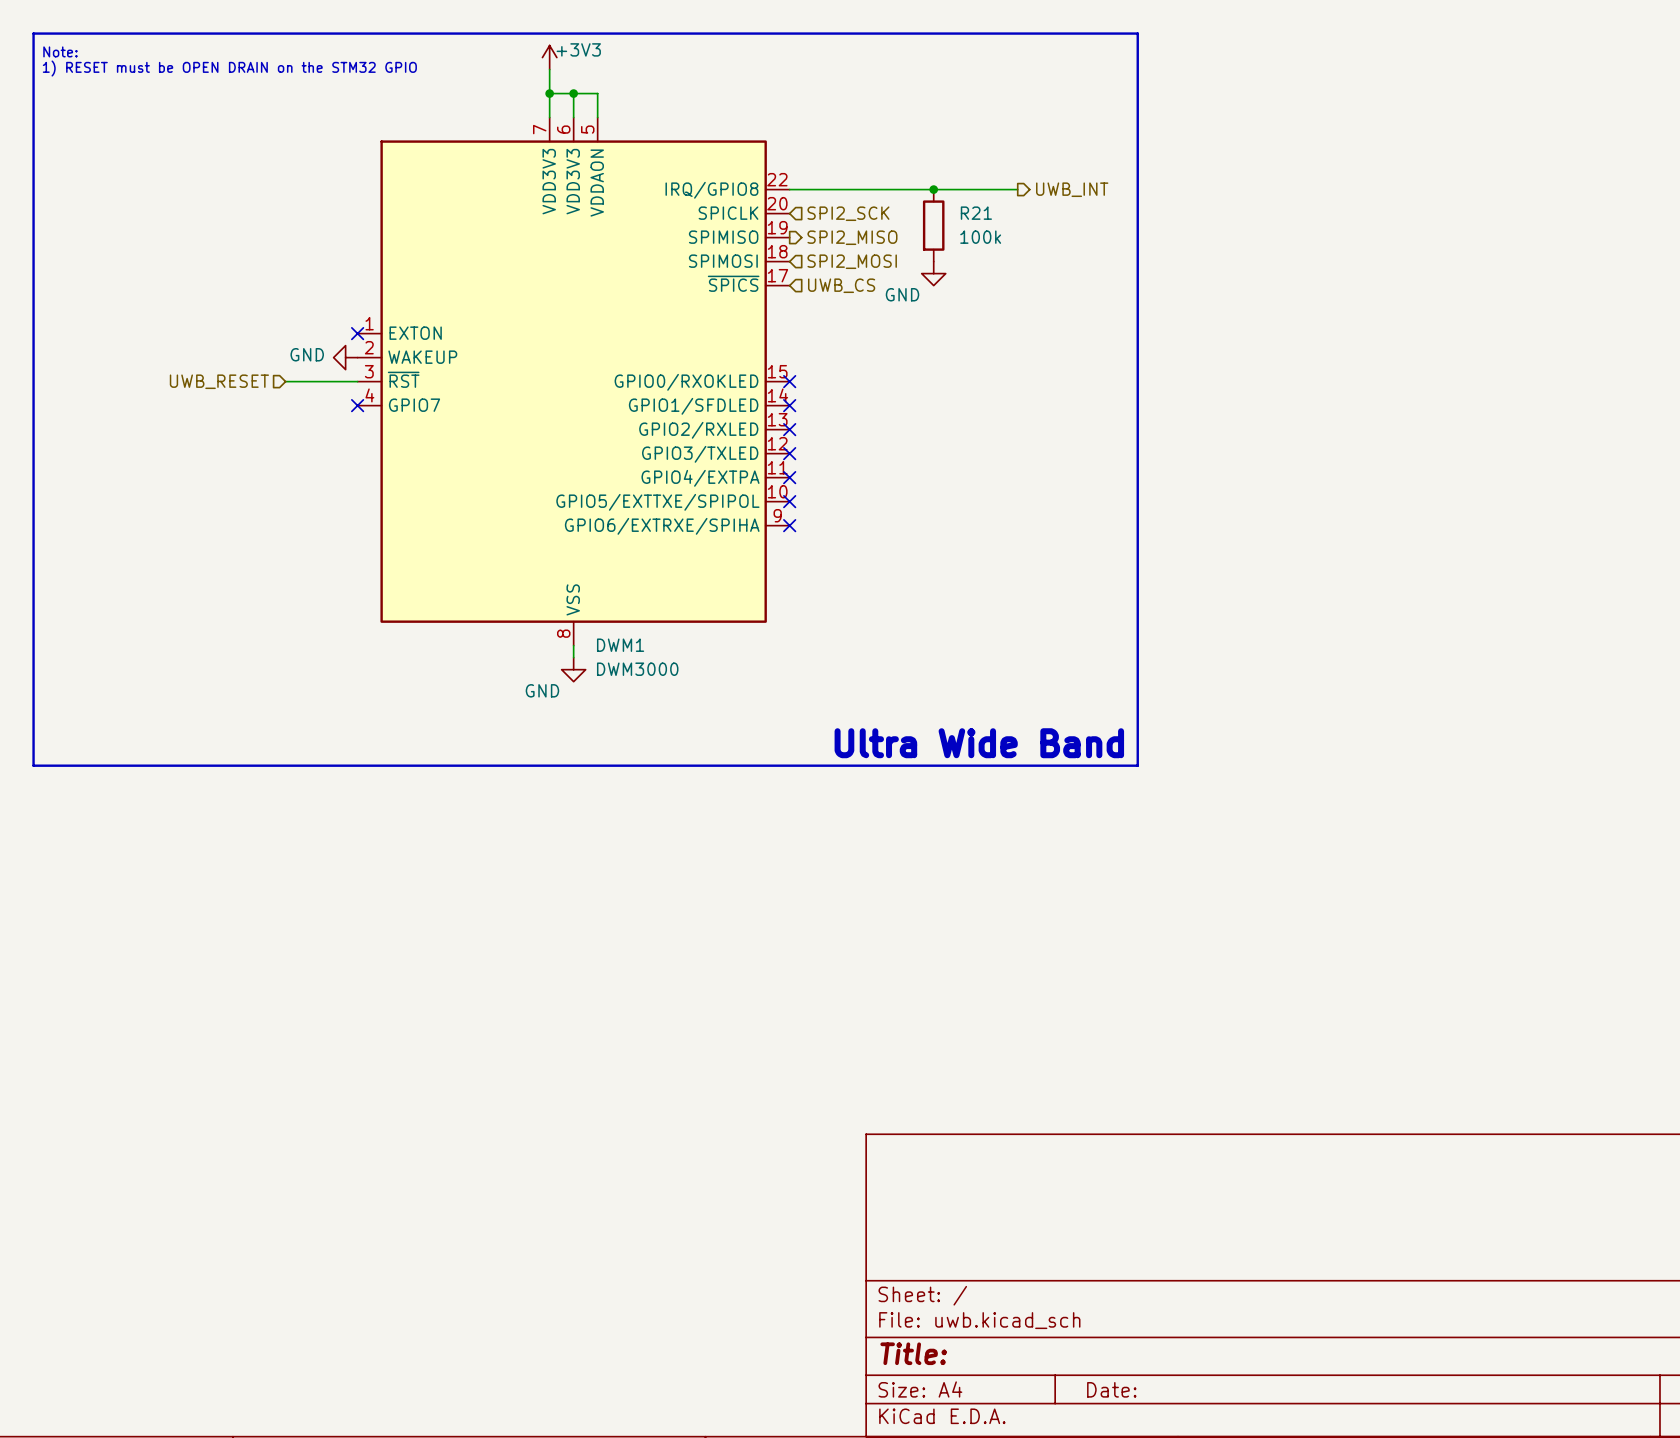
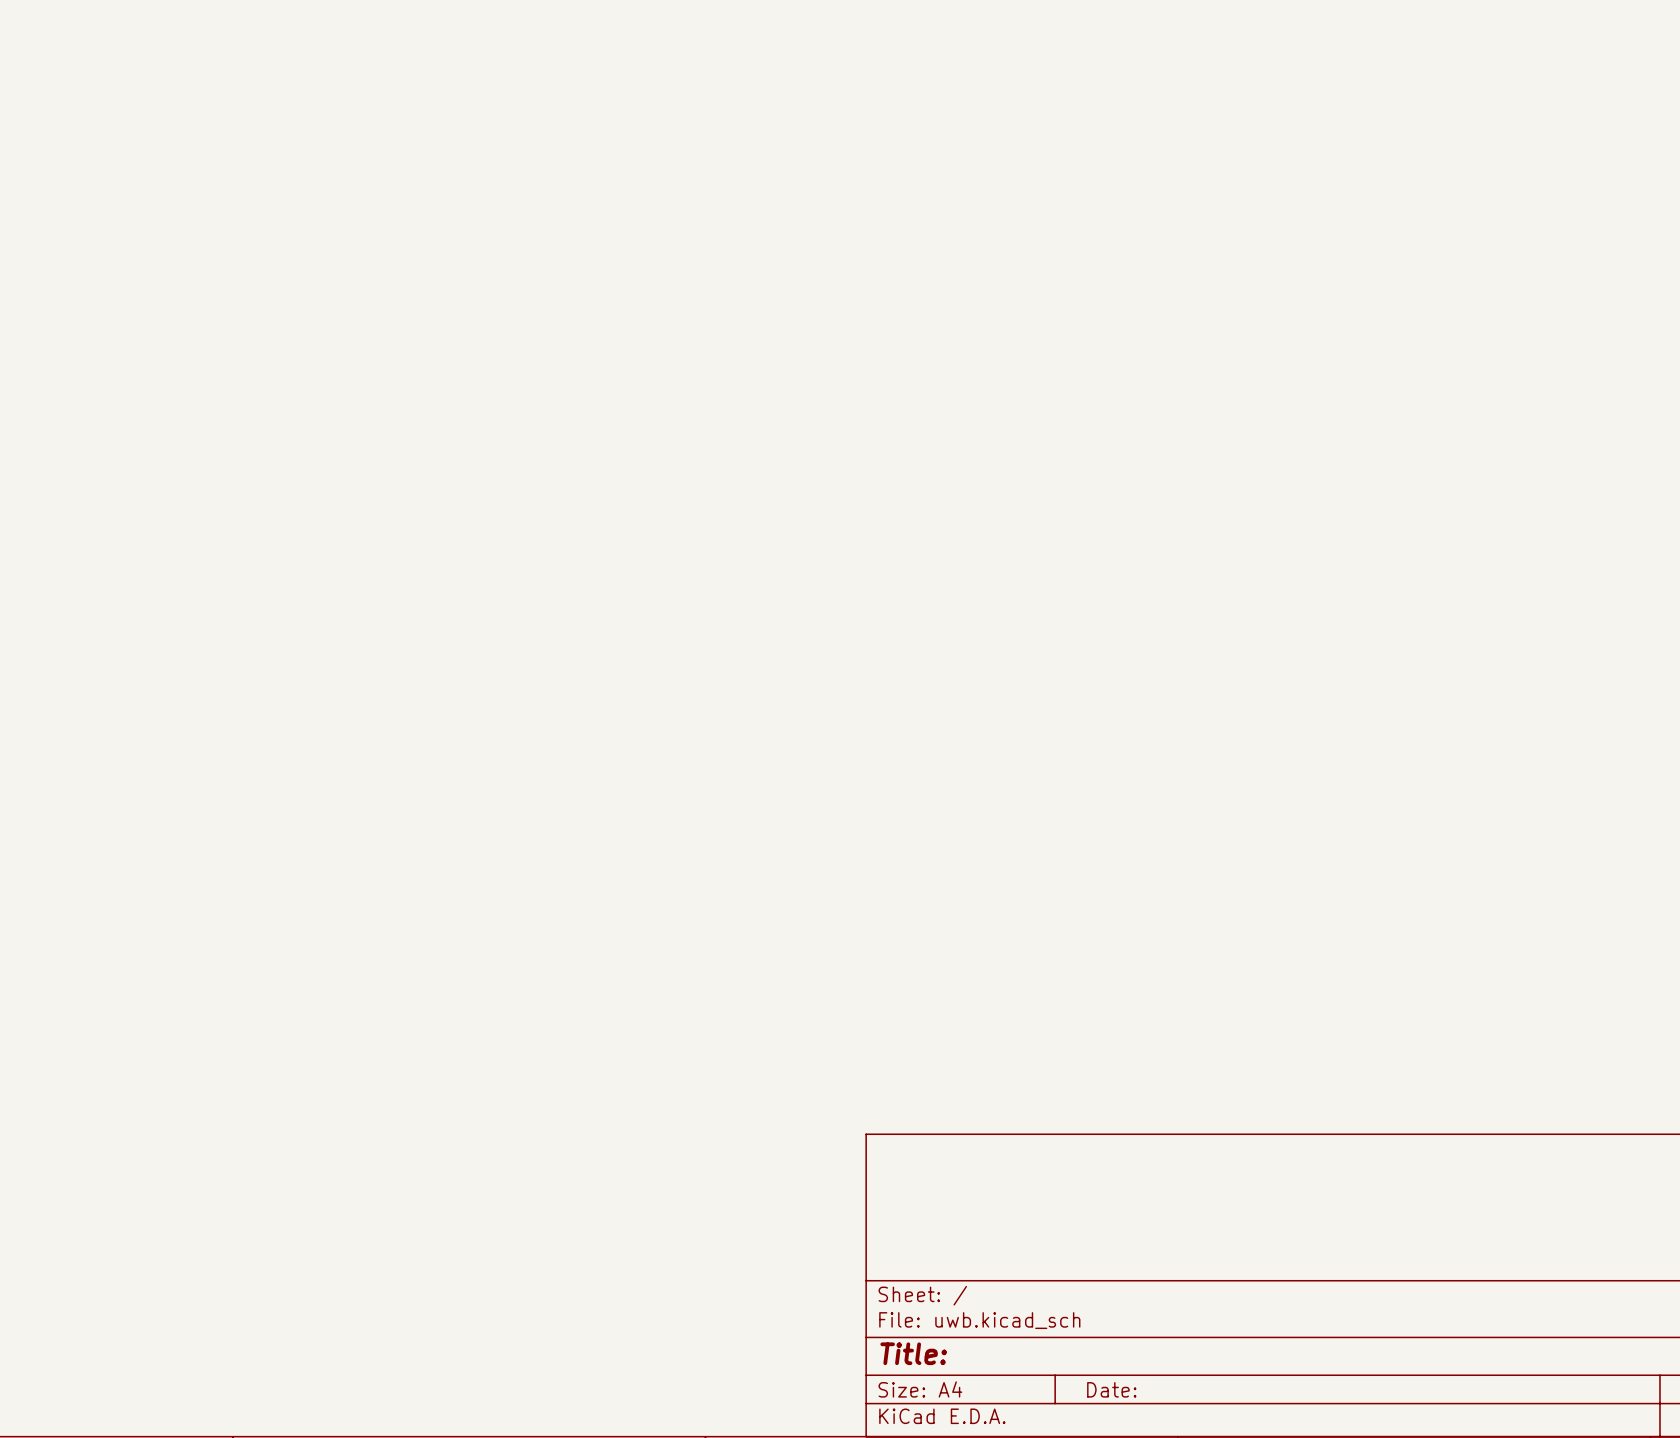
line: (33, 33) (1137, 33) (1137, 765) (33, 765) (33, 33) -> none
text: Note: (60, 51) -> none
power symbol: +3V3 (549, 57) -> none
text: 1) RESET must be OPEN DRAIN on the STM32 GPIO (229, 68) -> none
wire: (549, 69) (549, 117) -> none
wire: (549, 93) (597, 93) (597, 117) -> none
junction: (549, 93) -> none
wire: (573, 93) (573, 117) -> none
junction: (573, 93) -> none
wire: (789, 189) (1017, 189) -> none
junction: (933, 189) -> none
hierarchical label: UWB_INT (1072, 189) -> none
hierarchical label: SPI2_SCK (848, 213) -> none
R21: 100k (933, 225) -> none
hierarchical label: SPI2_MISO (852, 237) -> none
hierarchical label: SPI2_MOSI (852, 261) -> none
power symbol: GND (933, 273) -> none
hierarchical label: UWB_CS (841, 285) -> none
no-connect mark: (357, 333) -> none
power symbol: GND (345, 357) -> none
hierarchical label: UWB_RESET (219, 381) -> none
wire: (285, 381) (357, 381) -> none
DWM1: DWM3000 (573, 381) -> none
no-connect mark: (789, 381) -> none
no-connect mark: (357, 405) -> none
no-connect mark: (789, 405) -> none
no-connect mark: (789, 429) -> none
no-connect mark: (789, 453) -> none
no-connect mark: (789, 477) -> none
no-connect mark: (789, 501) -> none
no-connect mark: (789, 525) -> none
wire: (573, 645) (573, 657) -> none
power symbol: GND (573, 669) -> none
text: Ultra Wide Band (979, 743) -> none

